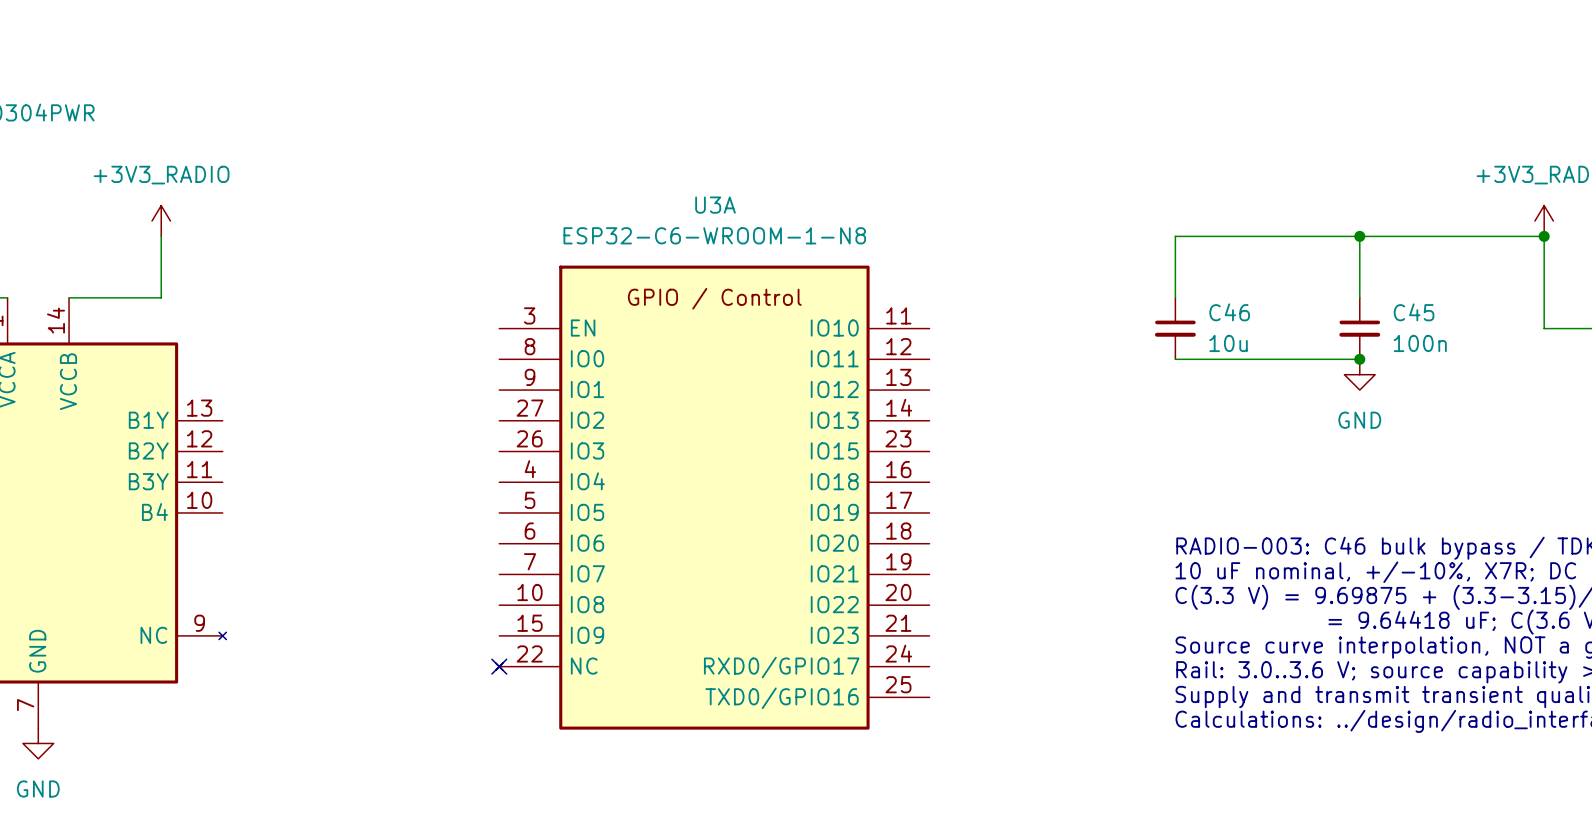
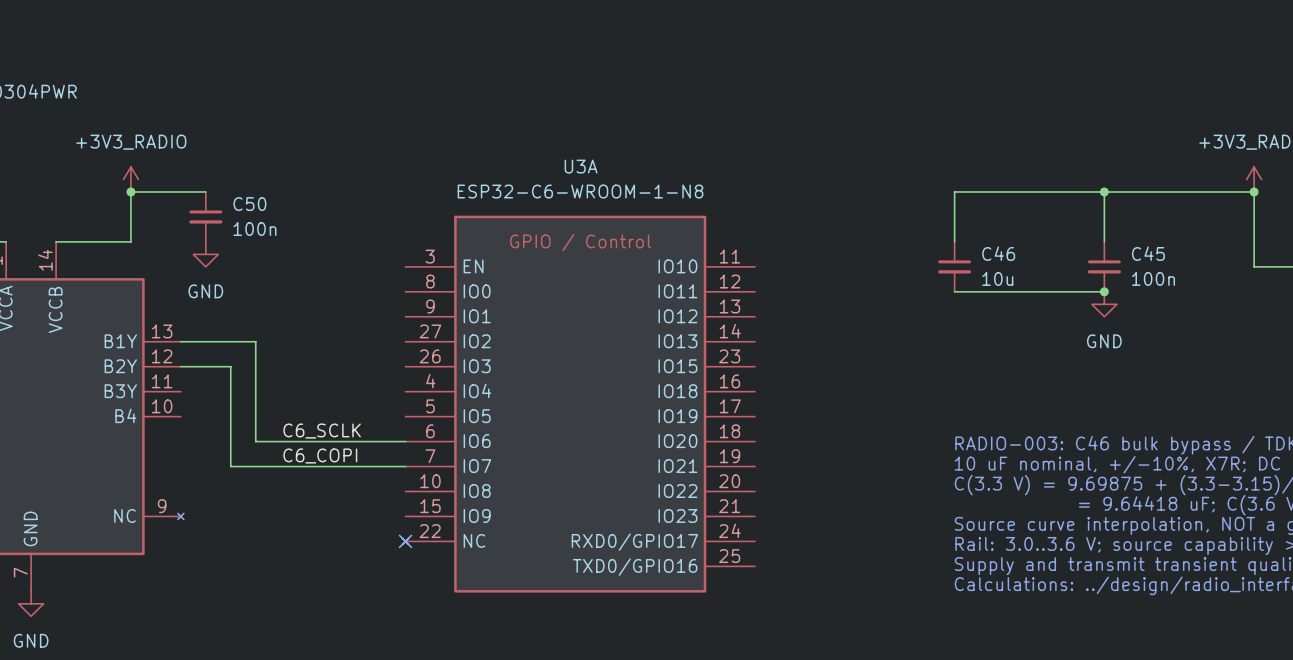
wire: none -> (130, 191) (205, 191)
junction: none -> (130, 191)
C50: none -> 100n (205, 216)
power symbol: none -> GND (205, 254)
wire: none -> (180, 341) (255, 341) (255, 441) (405, 441)
wire: none -> (180, 366) (230, 366) (230, 466) (405, 466)
label: none -> C6_SCLK (322, 431)
label: none -> C6_COPI (320, 456)

